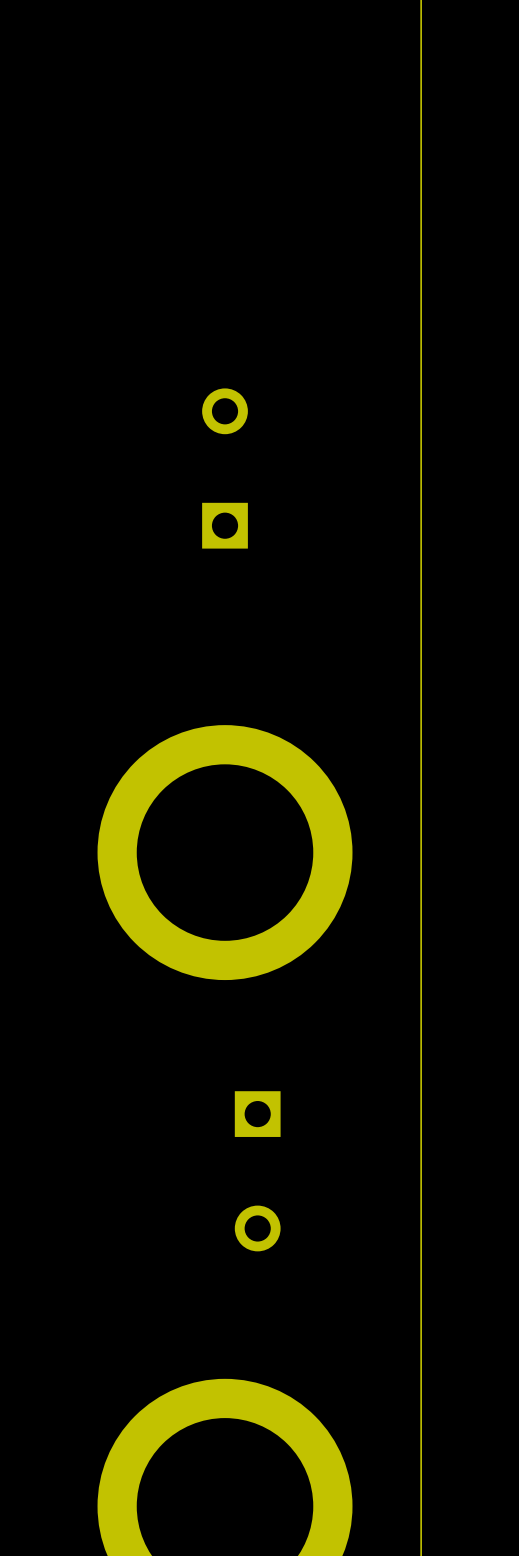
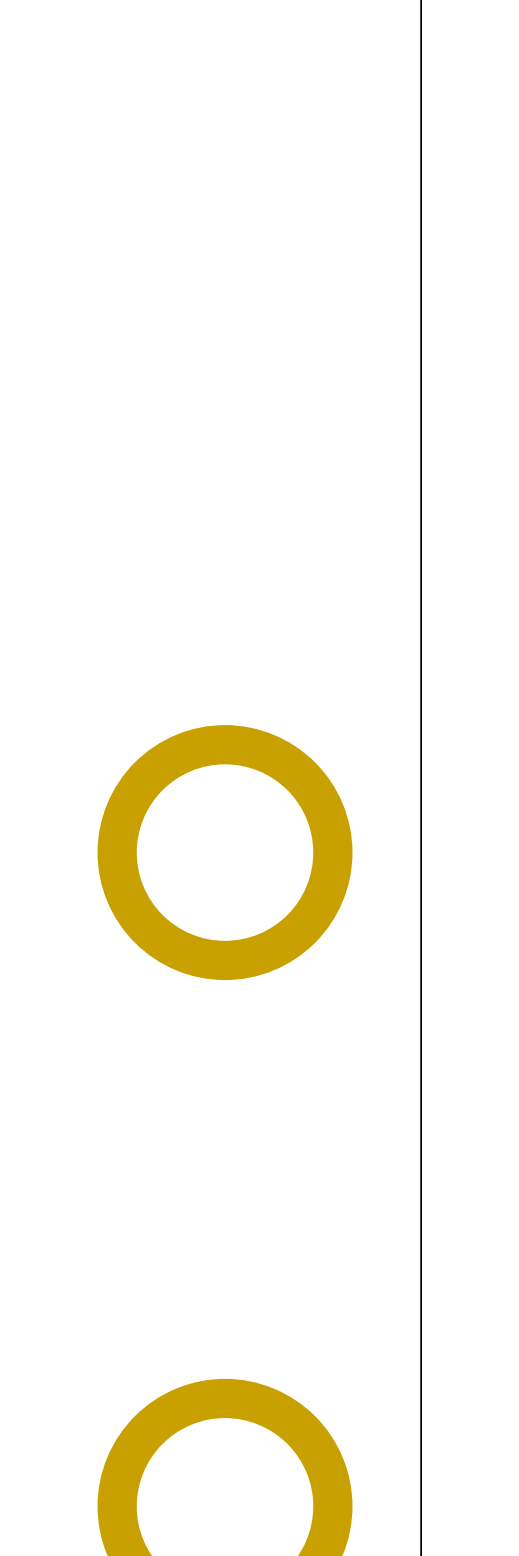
part: (225, 468) -> none
part: (257, 1171) -> none

